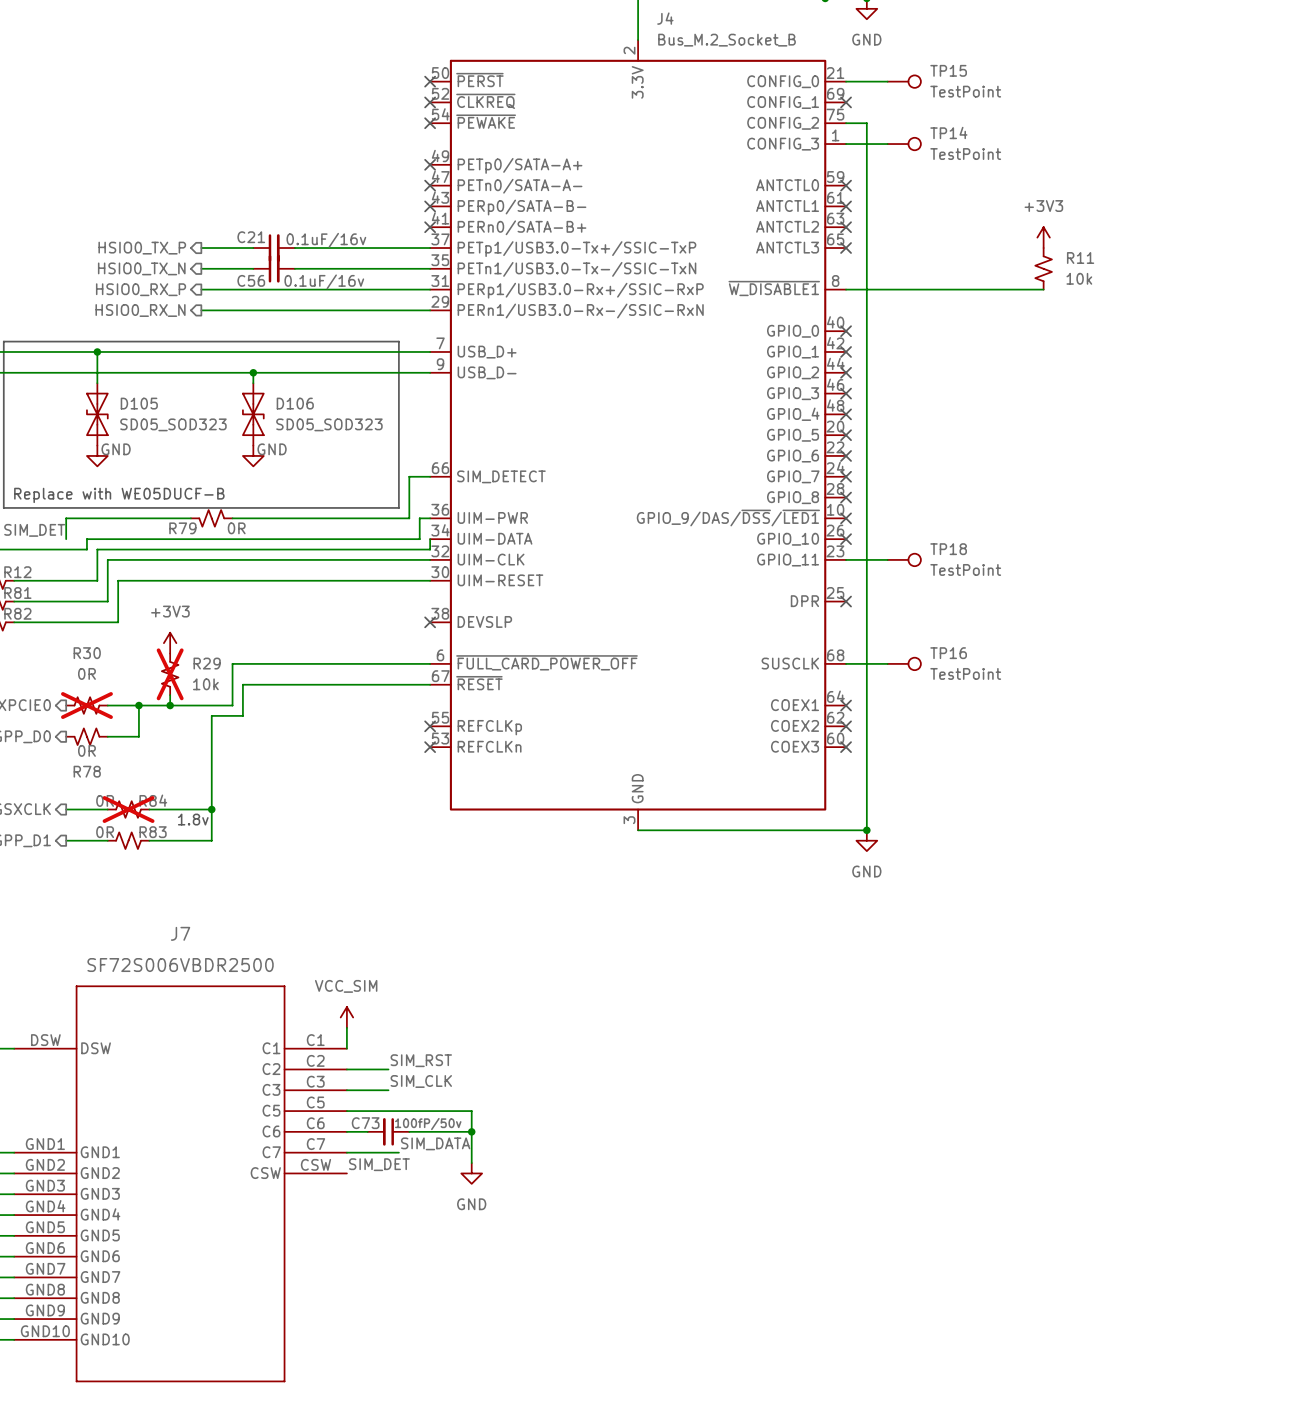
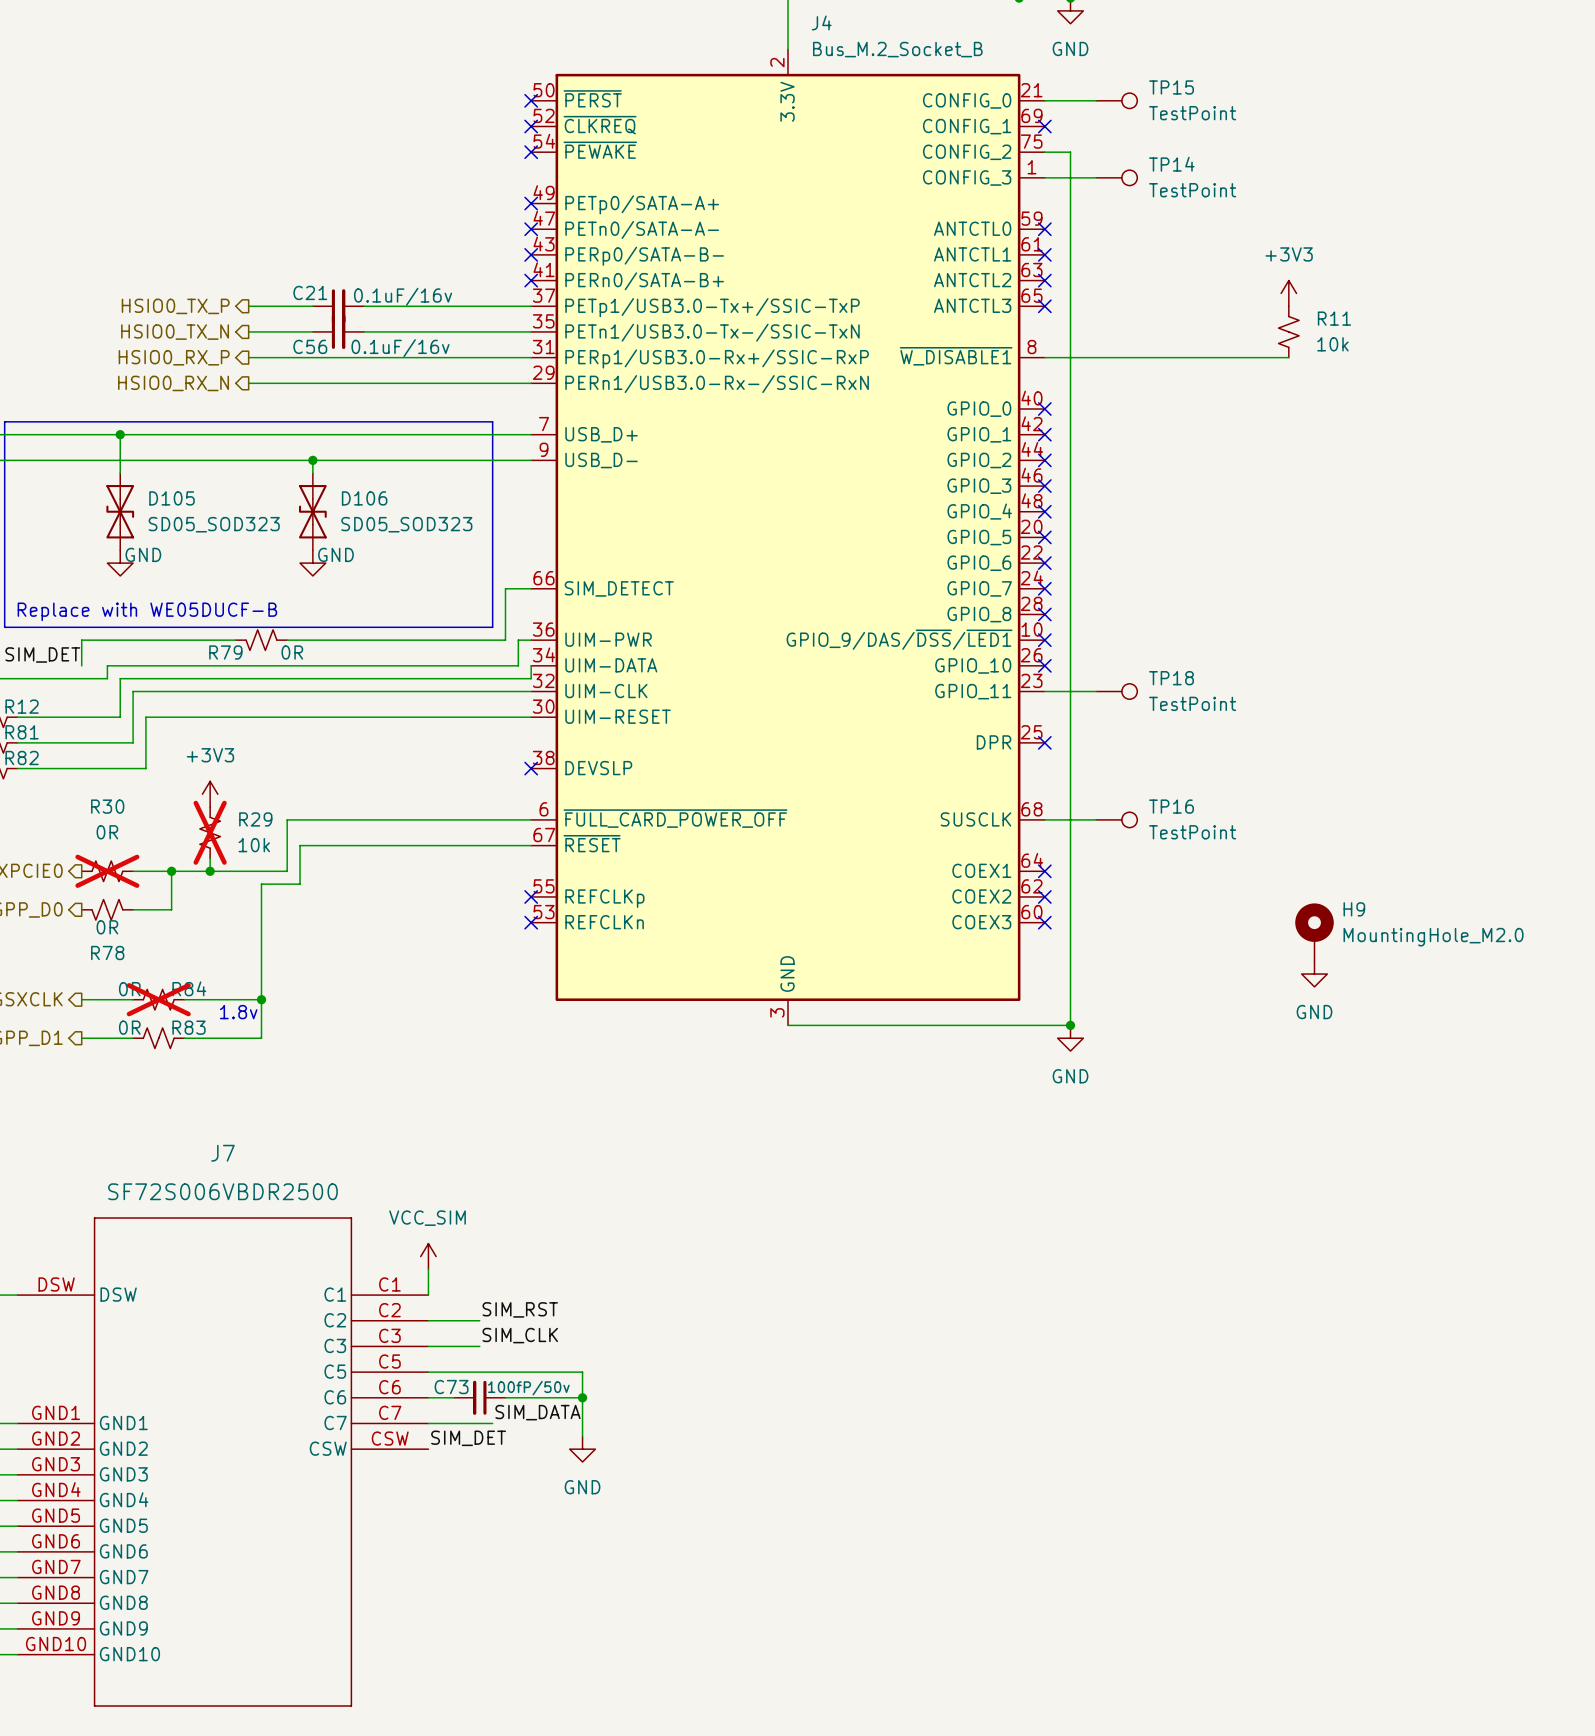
H9: none -> MountingHole_M2.0 (1314, 932)
power symbol: none -> GND (1314, 974)

